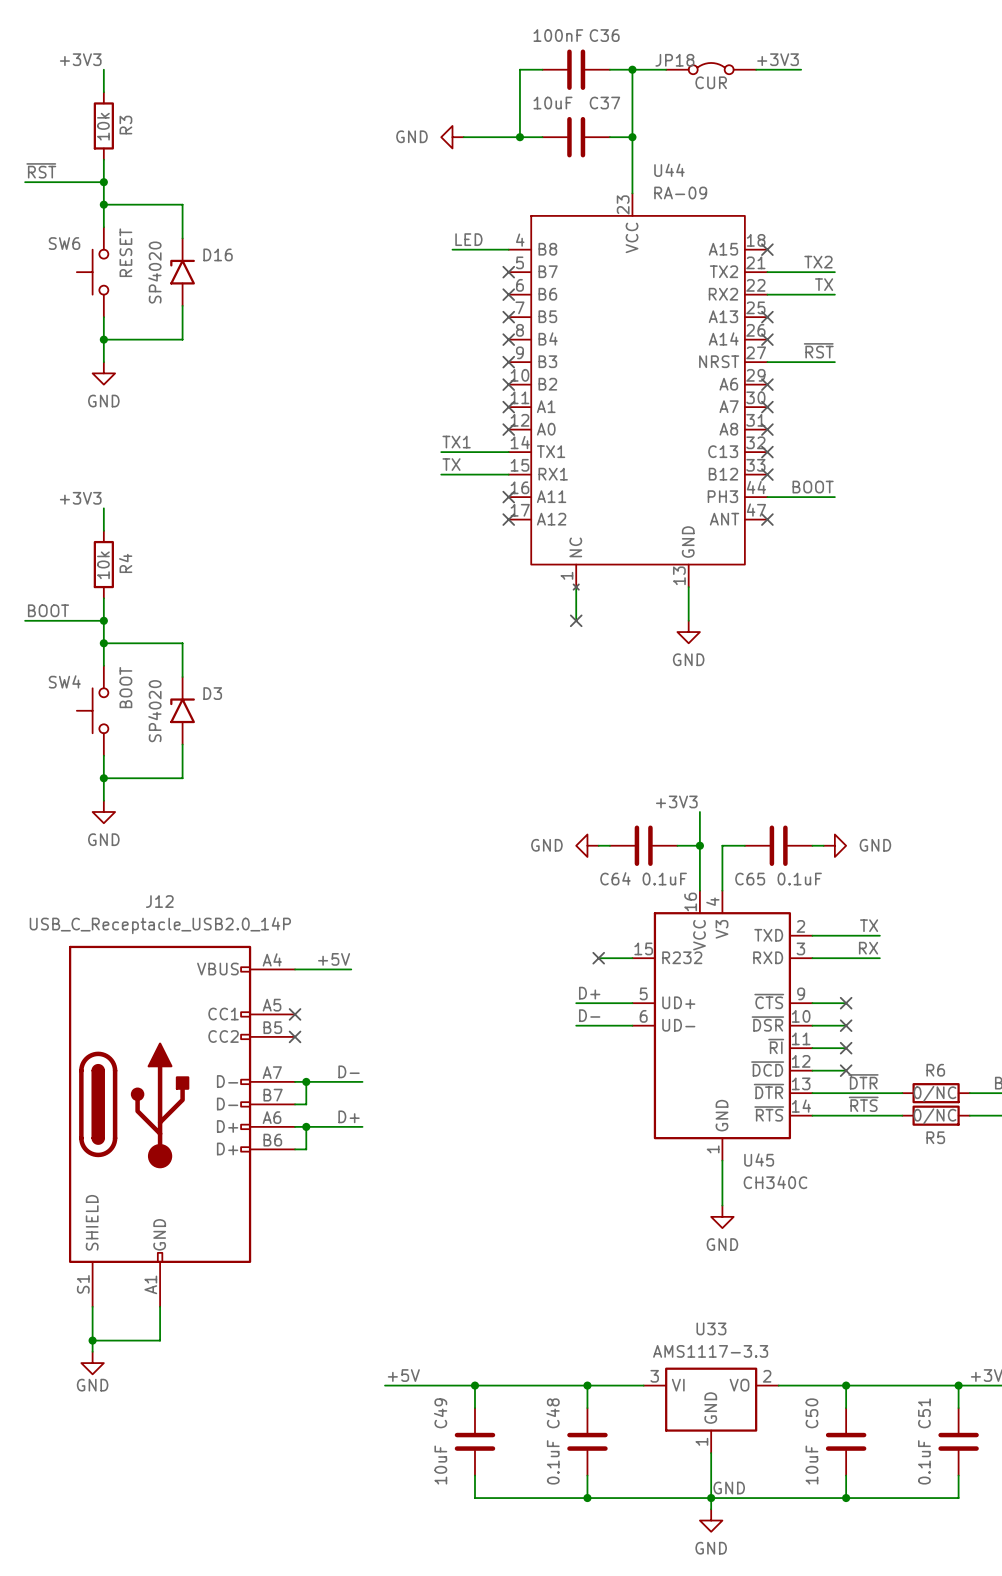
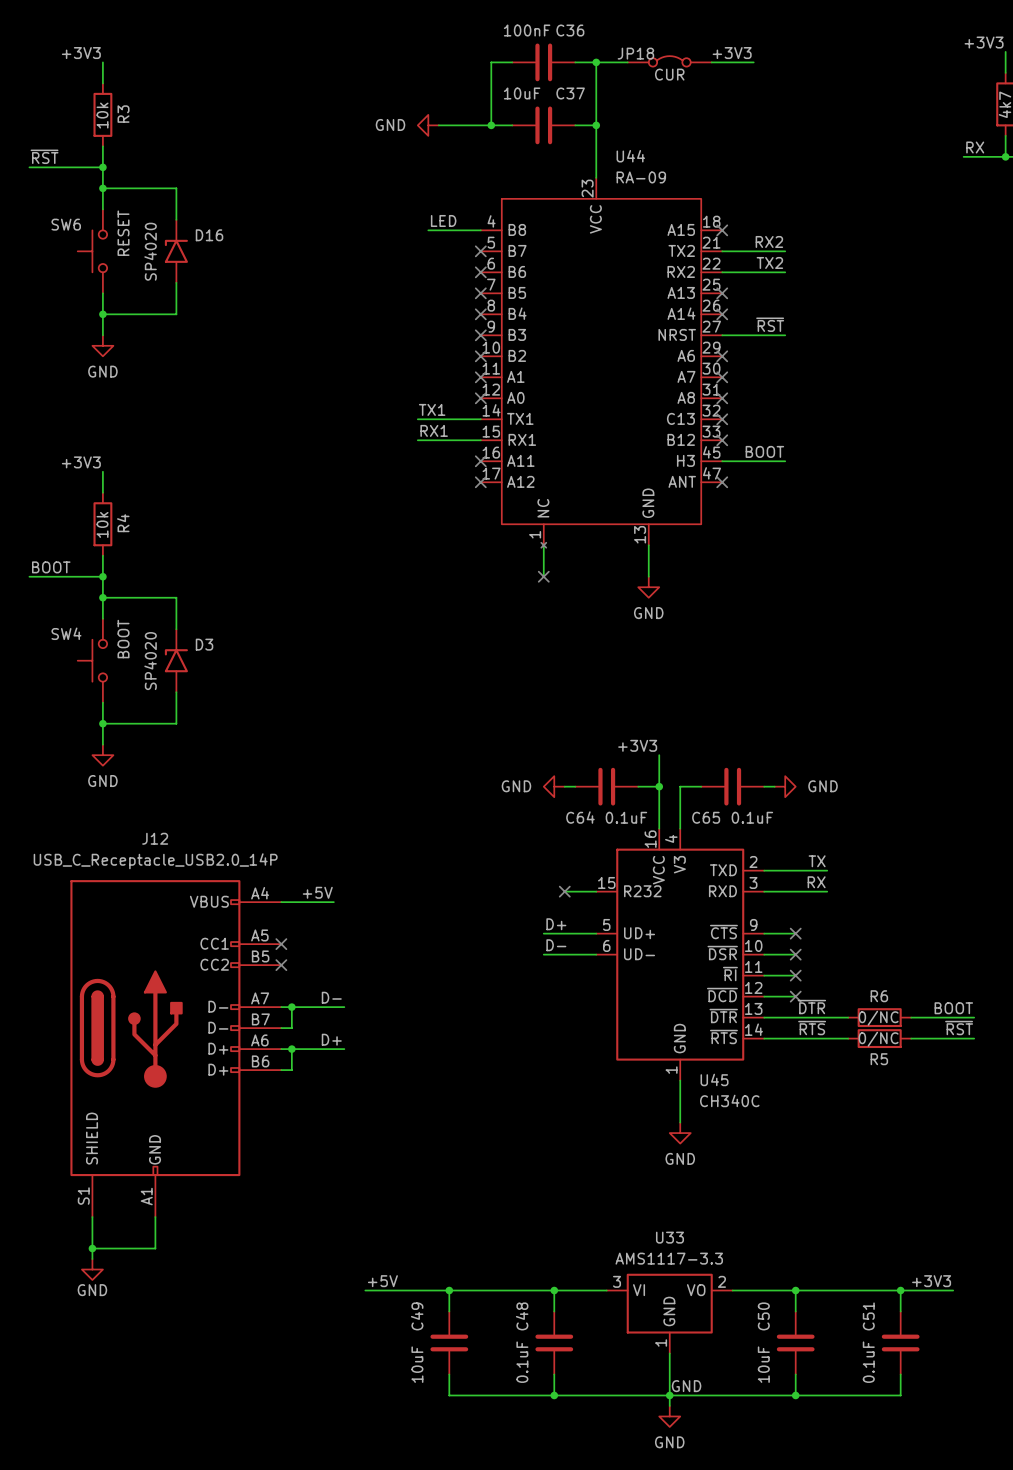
label: TX2 (818, 262) -> RX2 (769, 241)
label: TX (824, 284) -> TX2 (769, 262)
label: TX (451, 464) -> RX1 (434, 430)
U44 pin number: 44 (756, 487) -> 45 (711, 452)
U44 pin name: PH3 (722, 496) -> H3 (685, 460)

